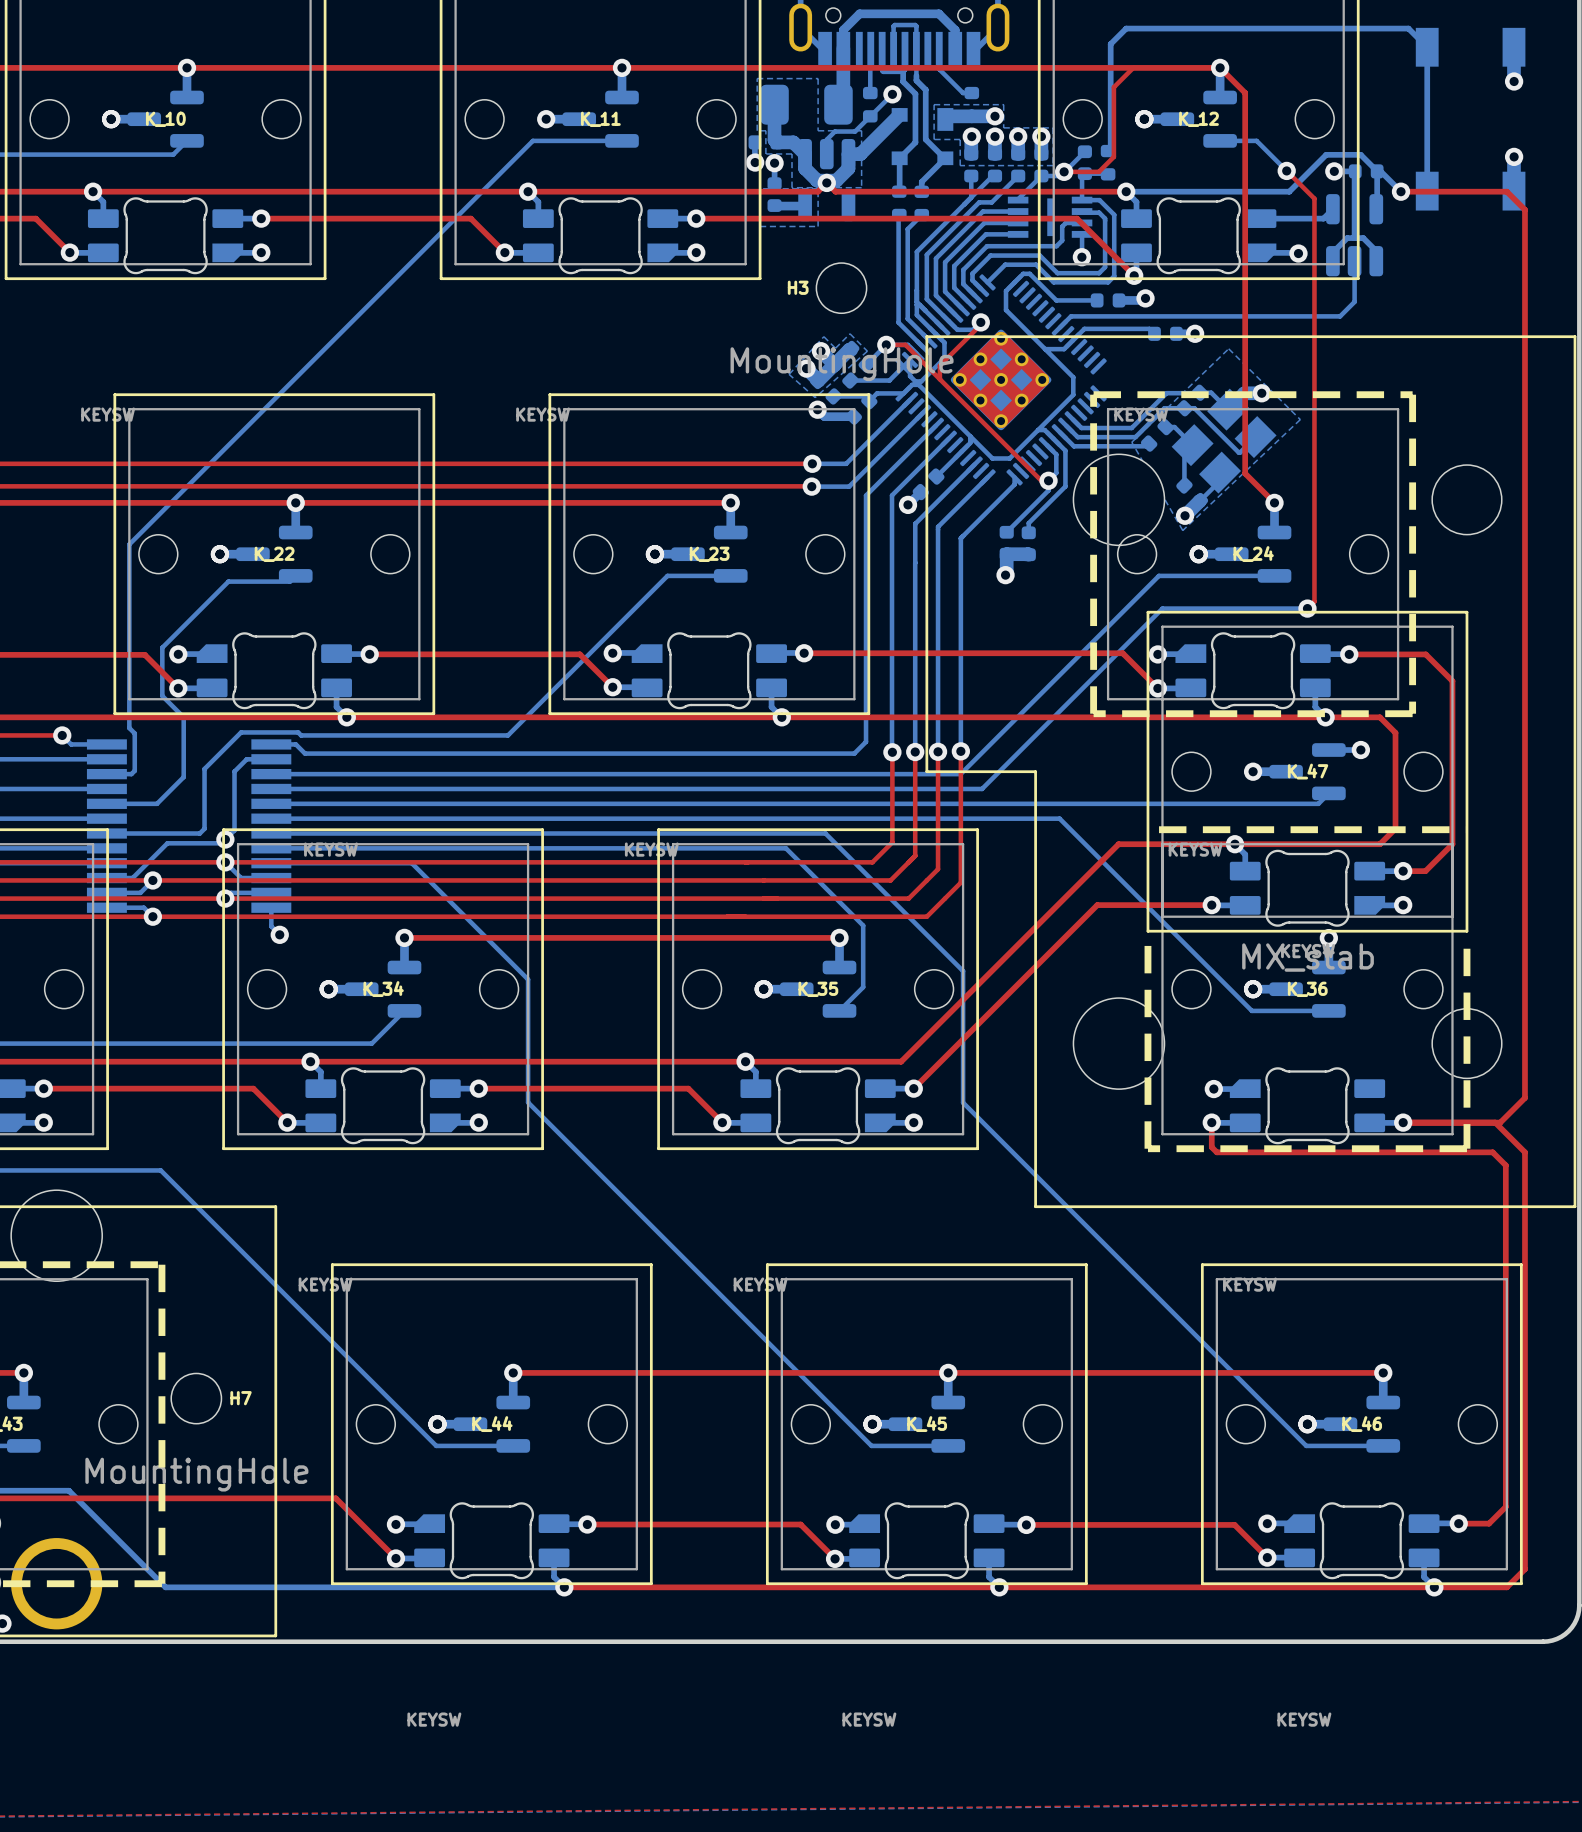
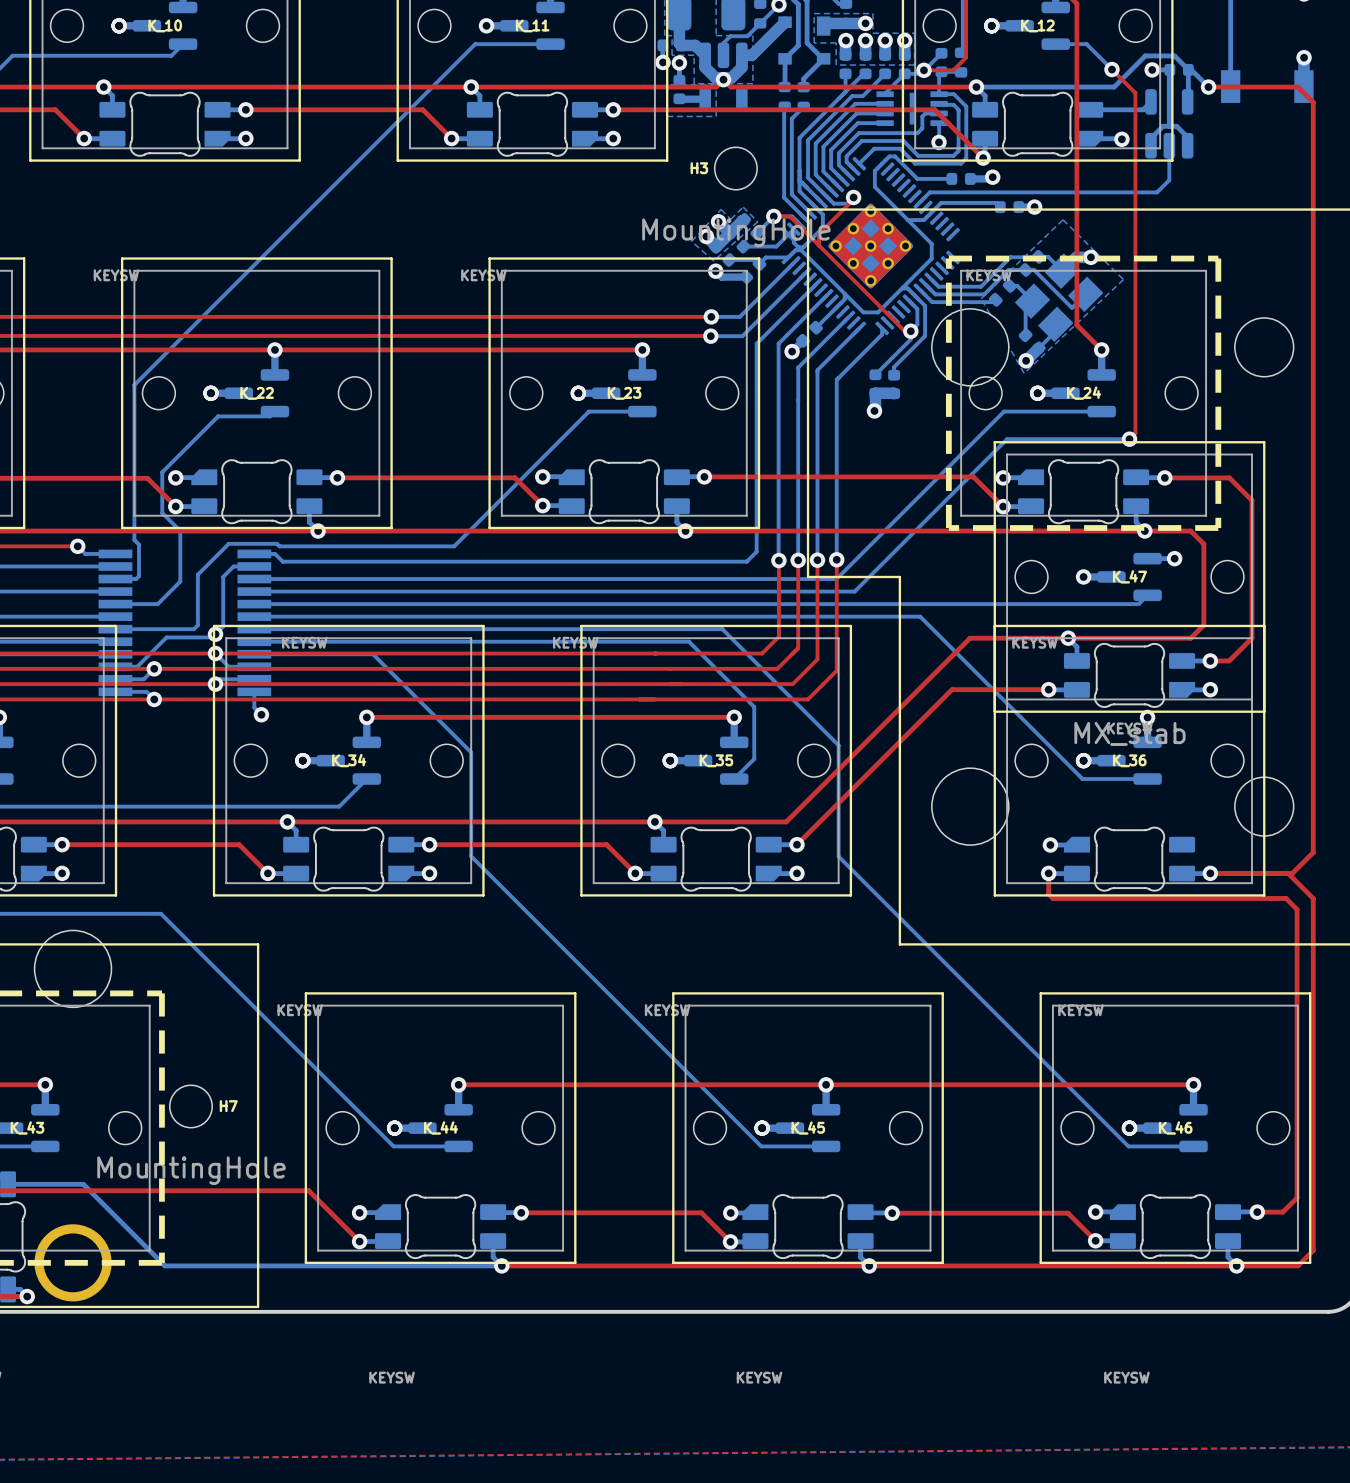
K_36 footprint: [1144, 826, 1471, 1153] -> [993, 624, 1266, 897]

